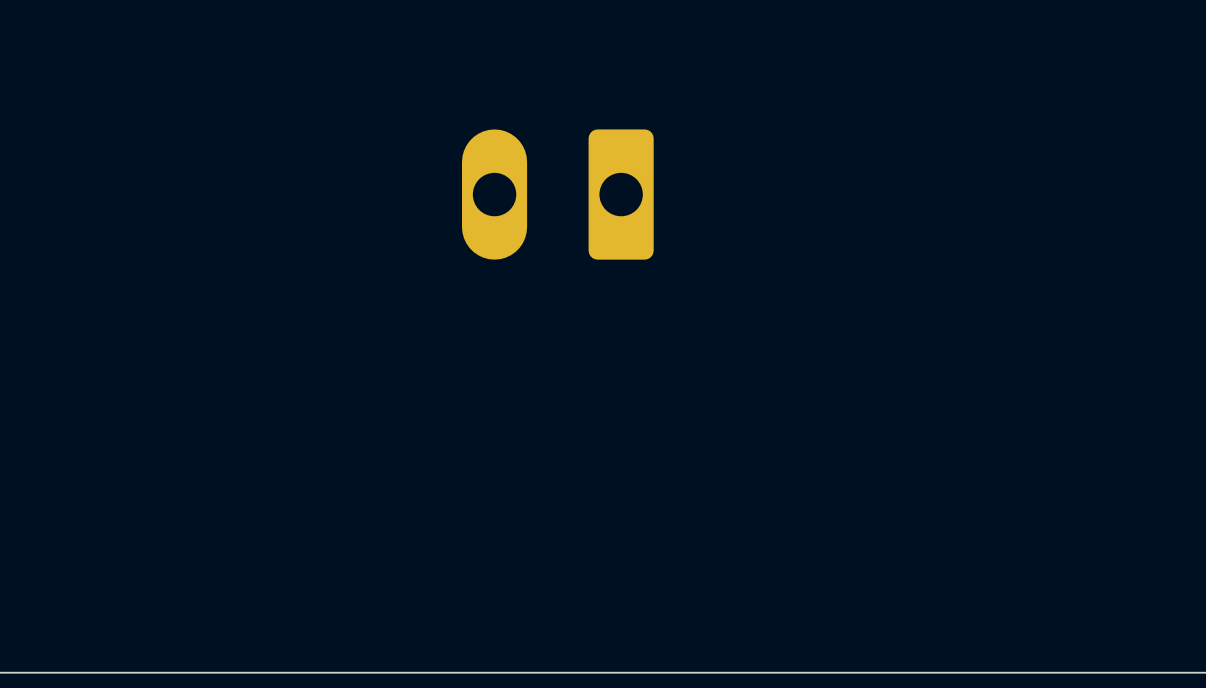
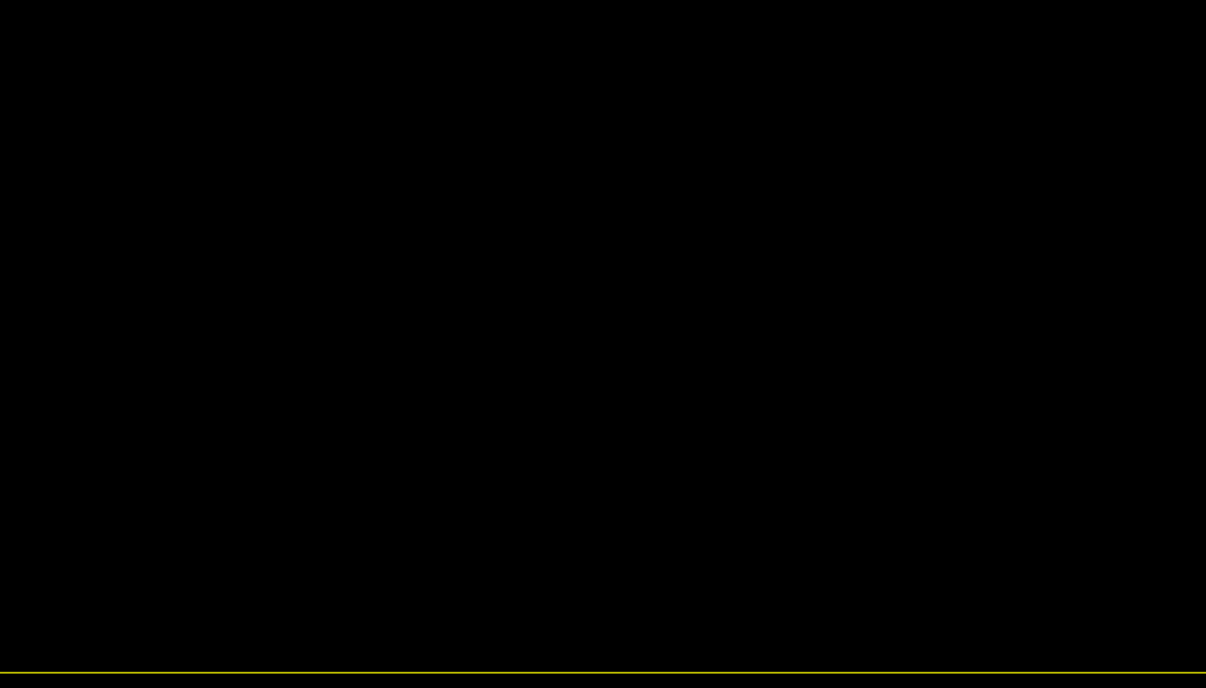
part: (557, 194) -> none

